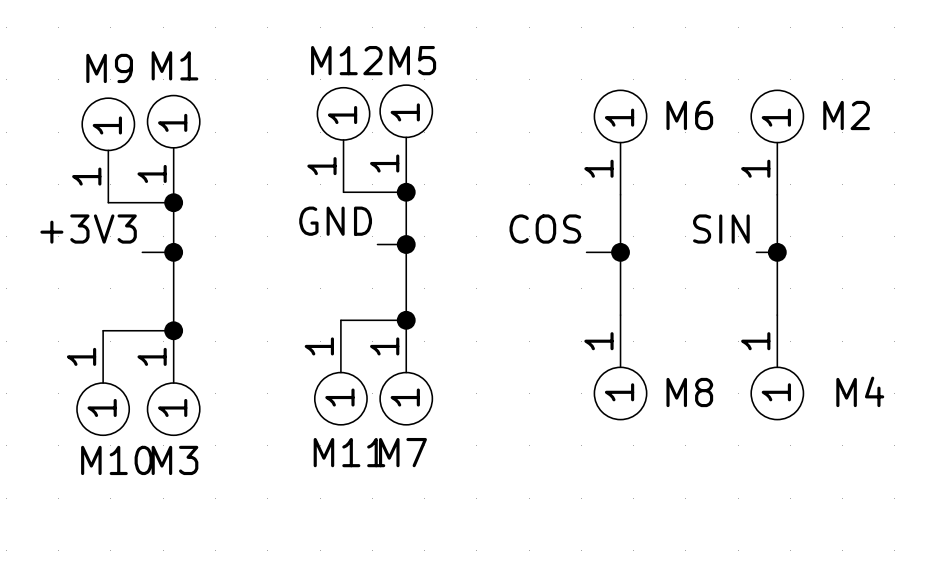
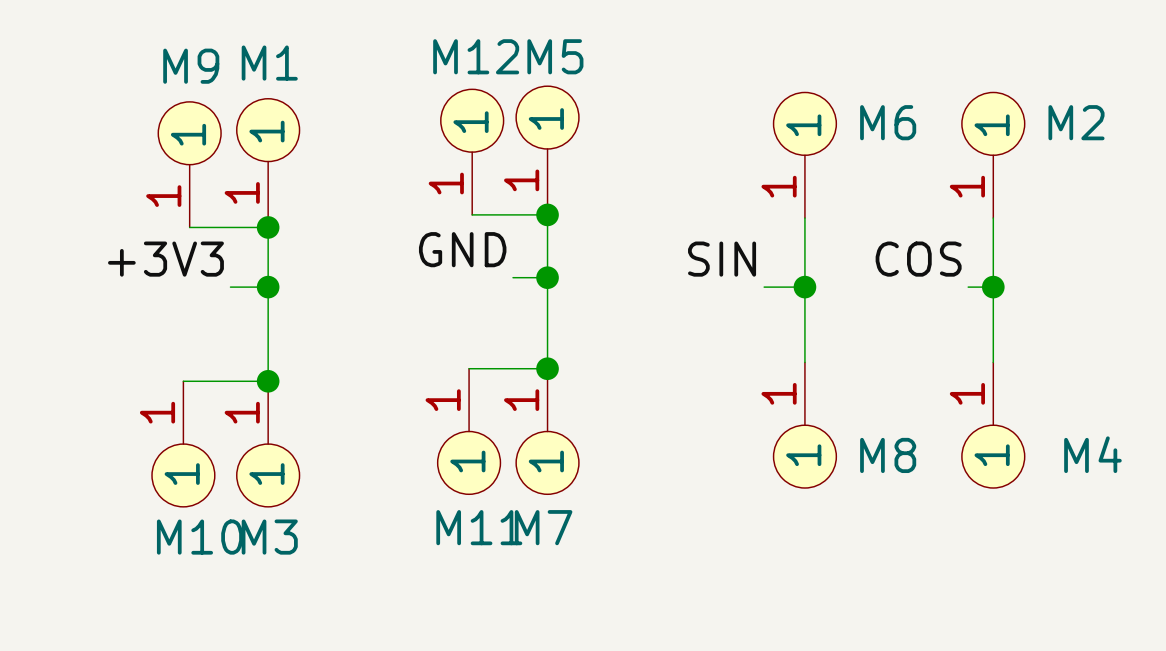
label: COS (545, 229) -> SIN (722, 259)
label: SIN (721, 229) -> COS (918, 259)

